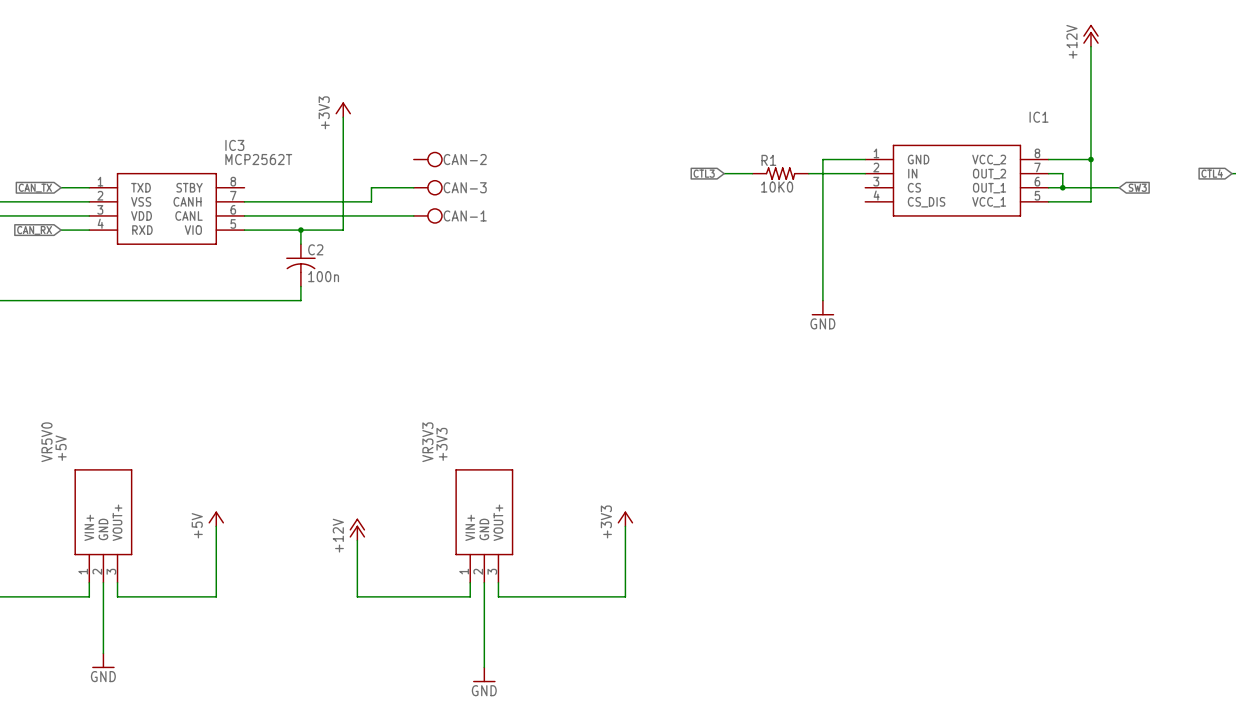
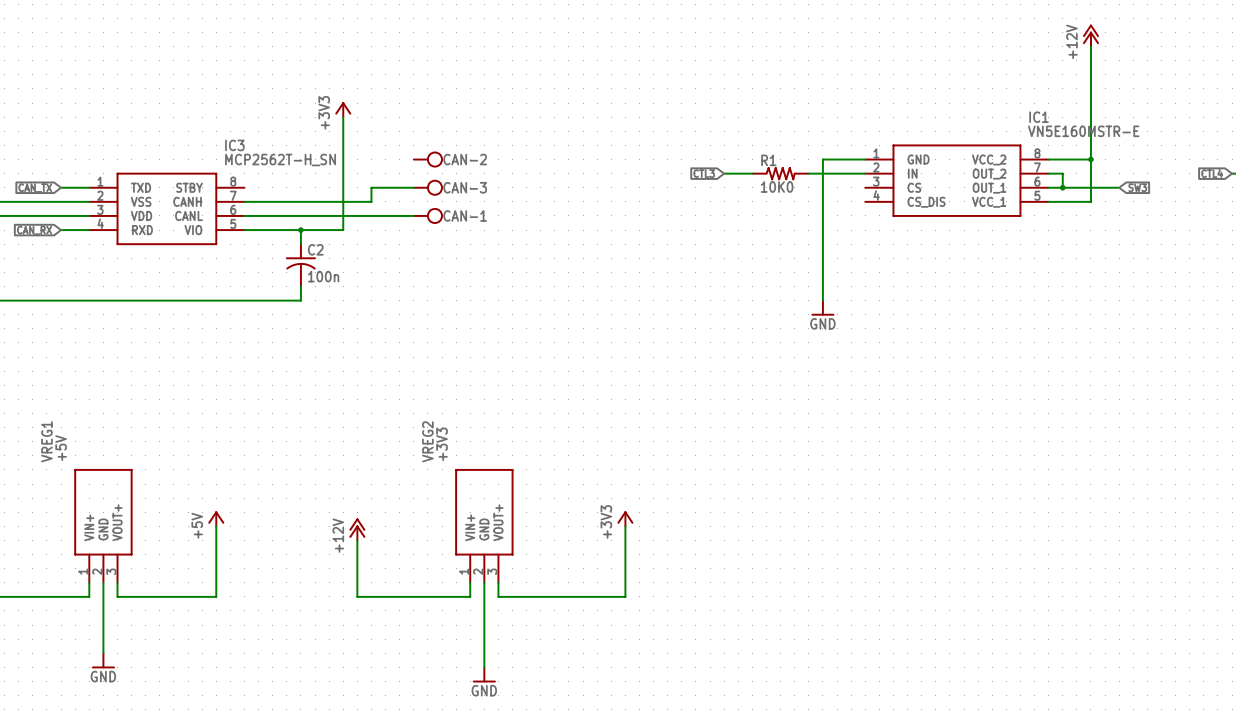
IC1 value: none -> VN5E160MSTR-E (1083, 131)
IC3 value: MCP2562T (258, 159) -> MCP2562T-H_SN (280, 160)
VR5V0 name: VR5V0 (46, 442) -> VREG1 (46, 441)
VR3V3 name: VR3V3 (427, 442) -> VREG2 (427, 441)

